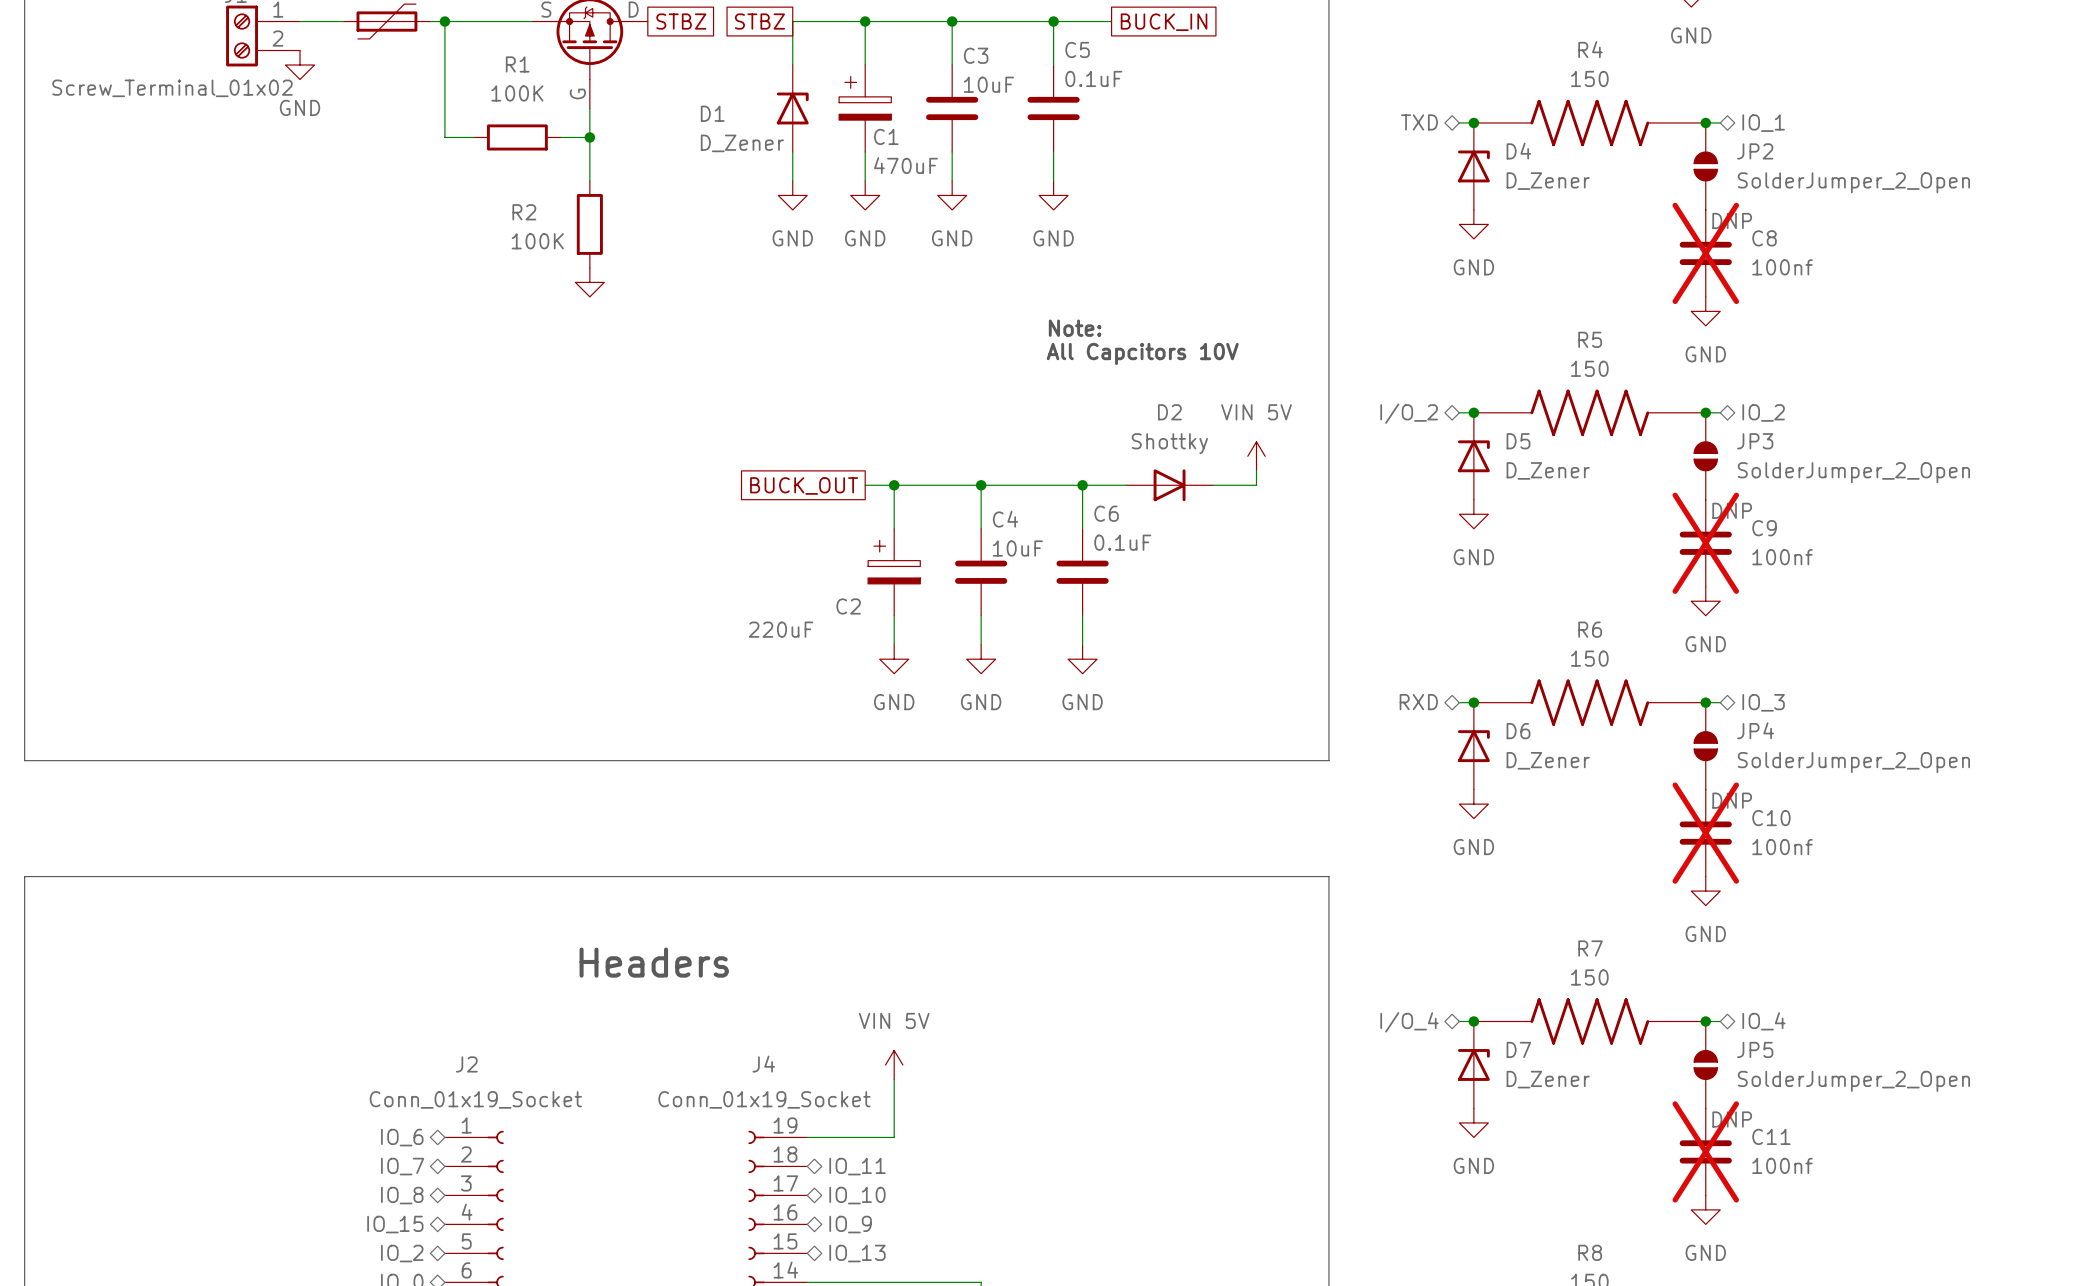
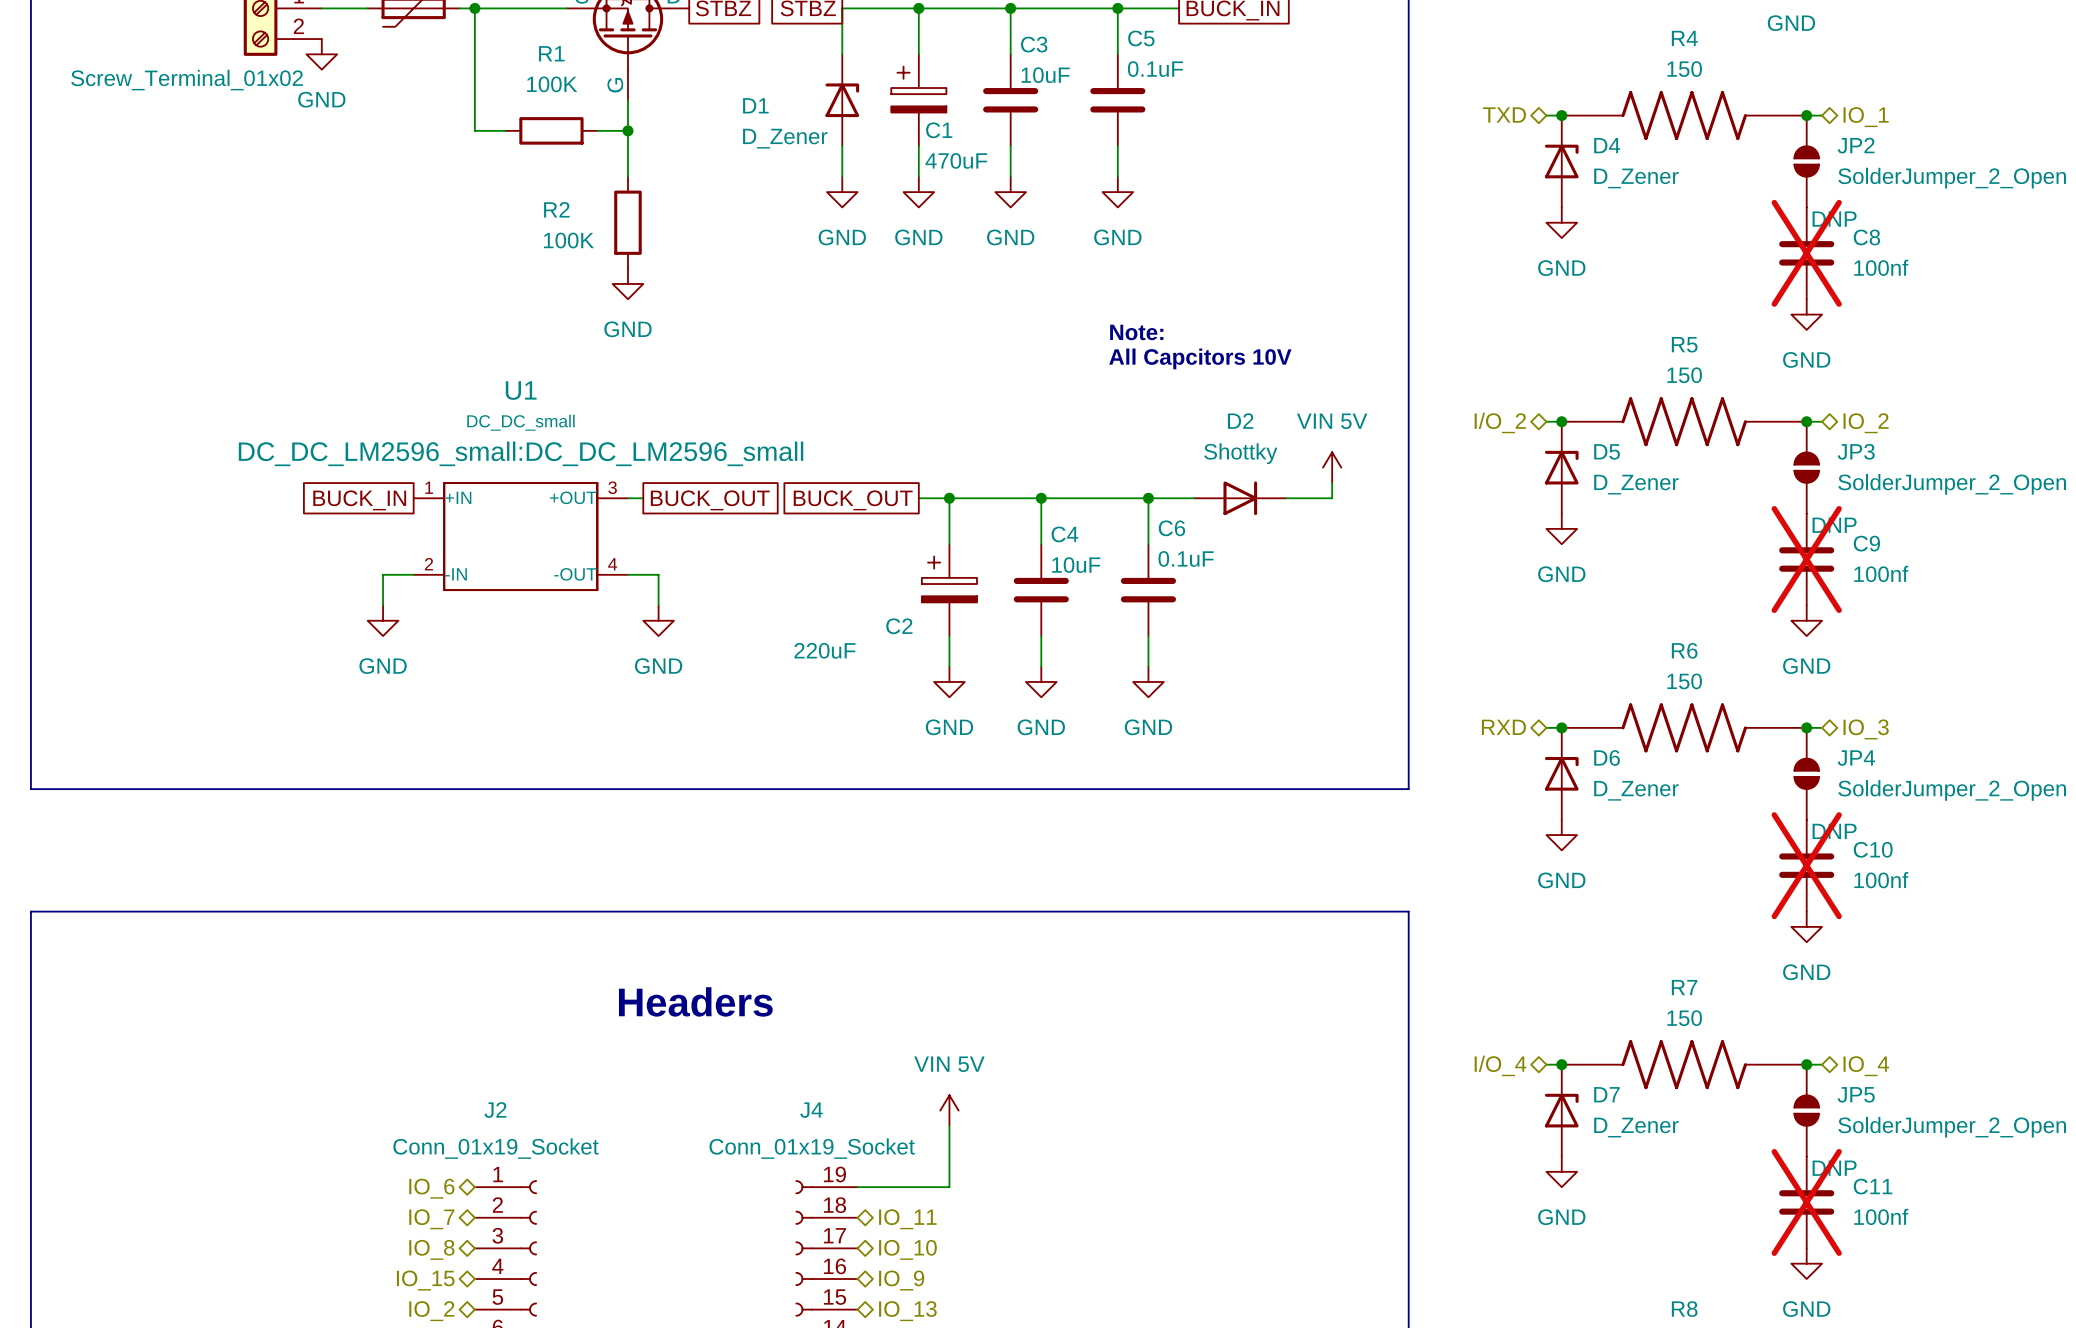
power symbol text: none -> GND (628, 329)
global label: none -> BUCK_IN (359, 500)
wire: none -> (627, 498) (643, 498)
global label: none -> BUCK_OUT (710, 500)
U1: none -> DC_DC_small (520, 536)
wire: none -> (413, 574) (383, 574) (383, 605)
wire: none -> (627, 574) (658, 574) (658, 605)
power symbol: none -> GND (383, 620)
power symbol: none -> GND (658, 620)

